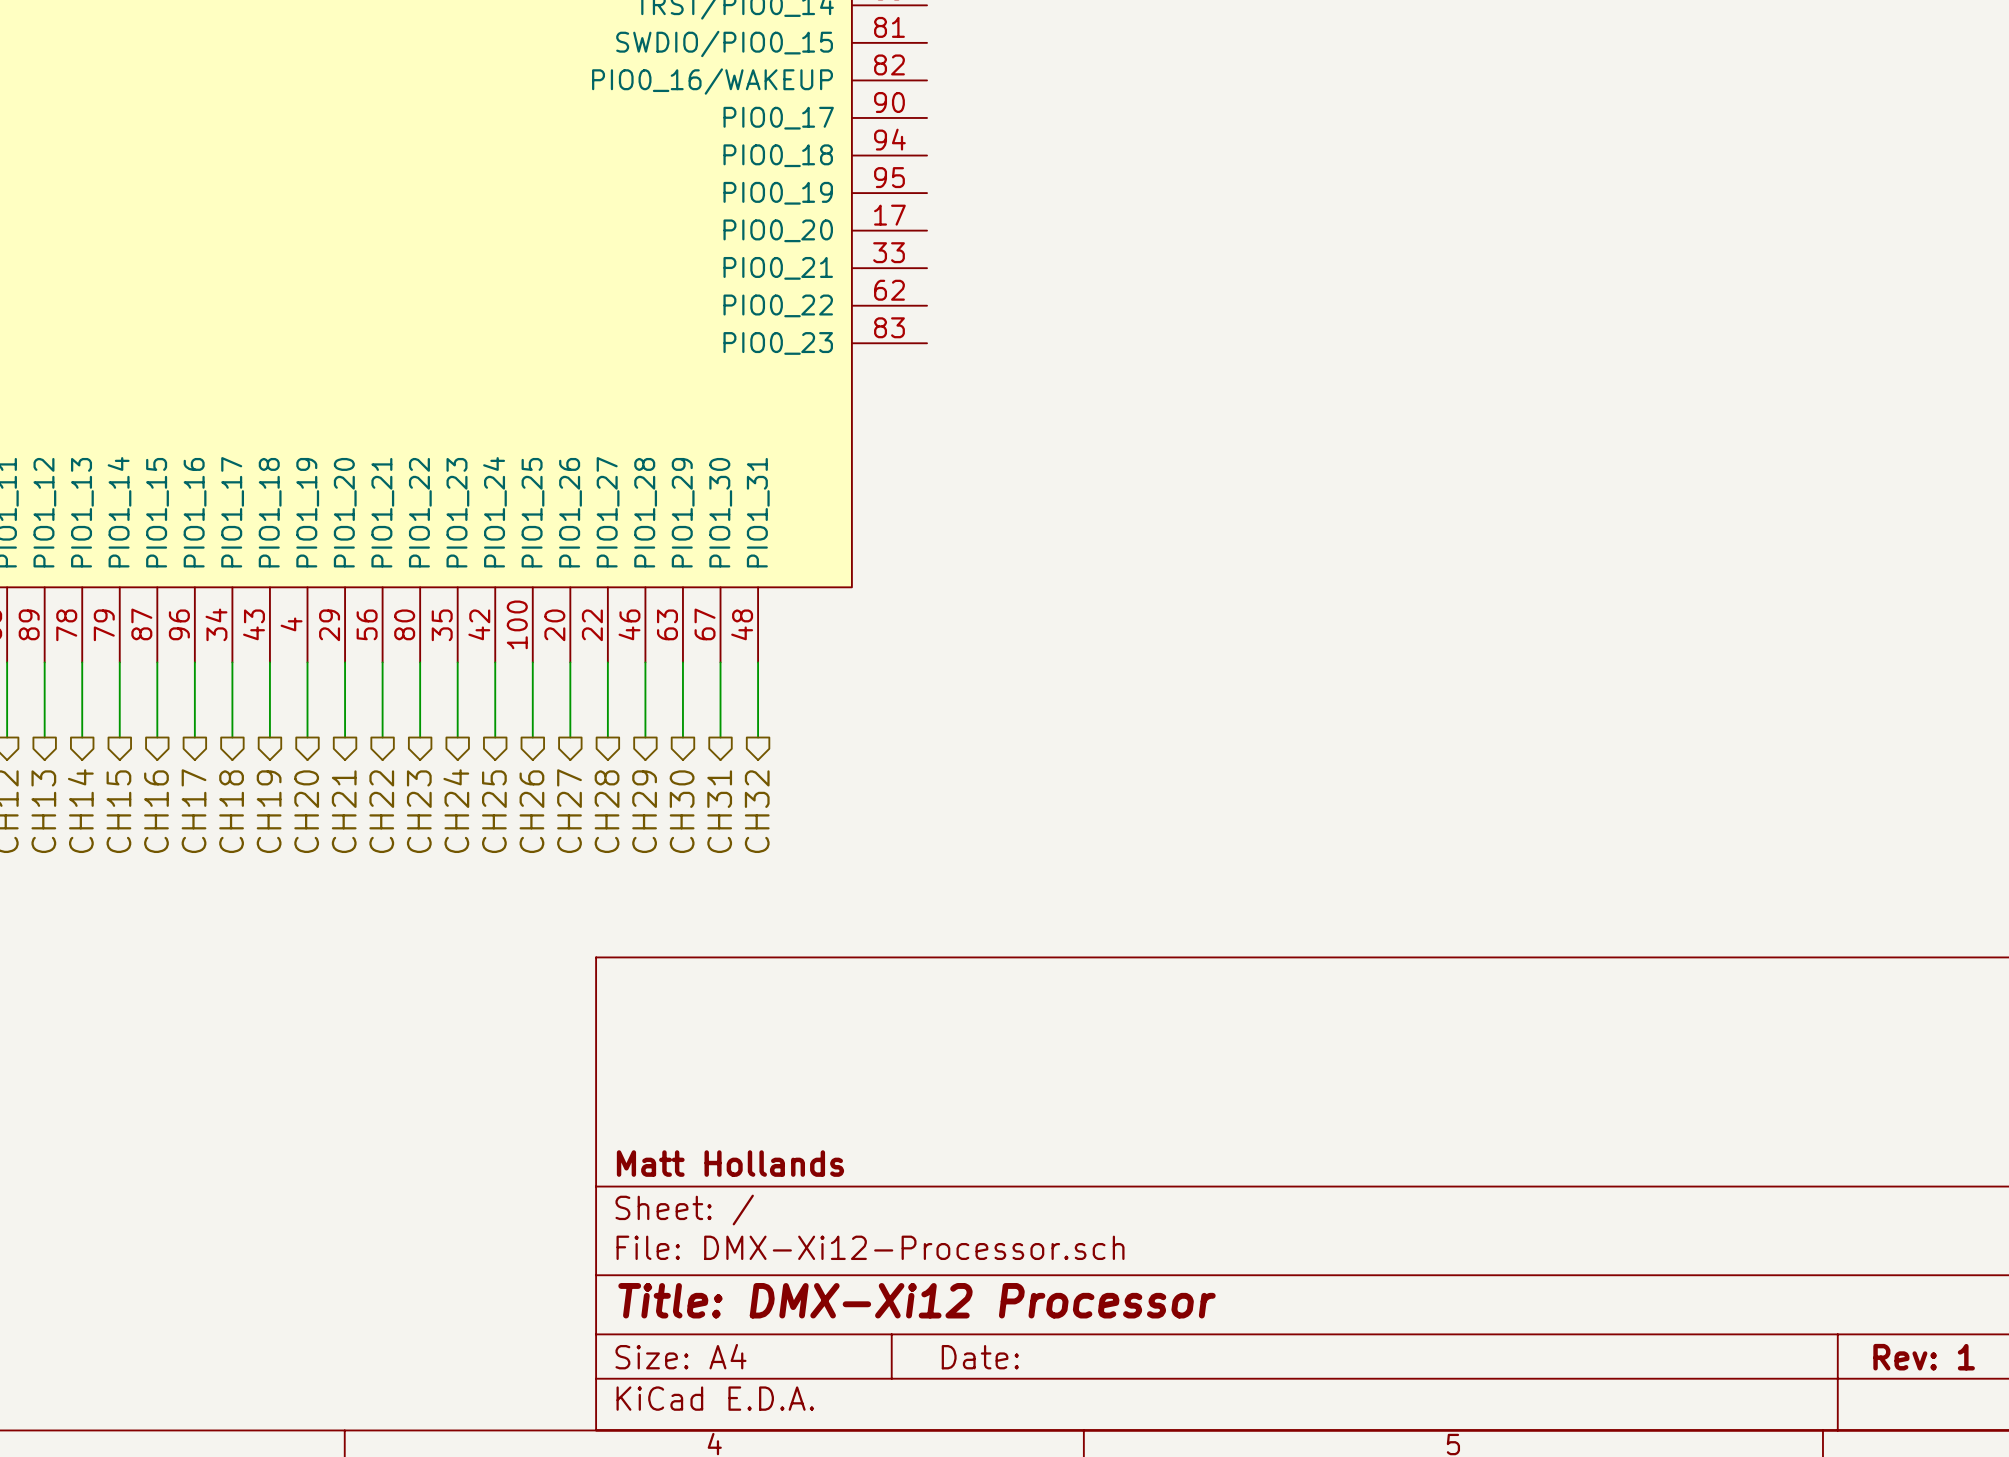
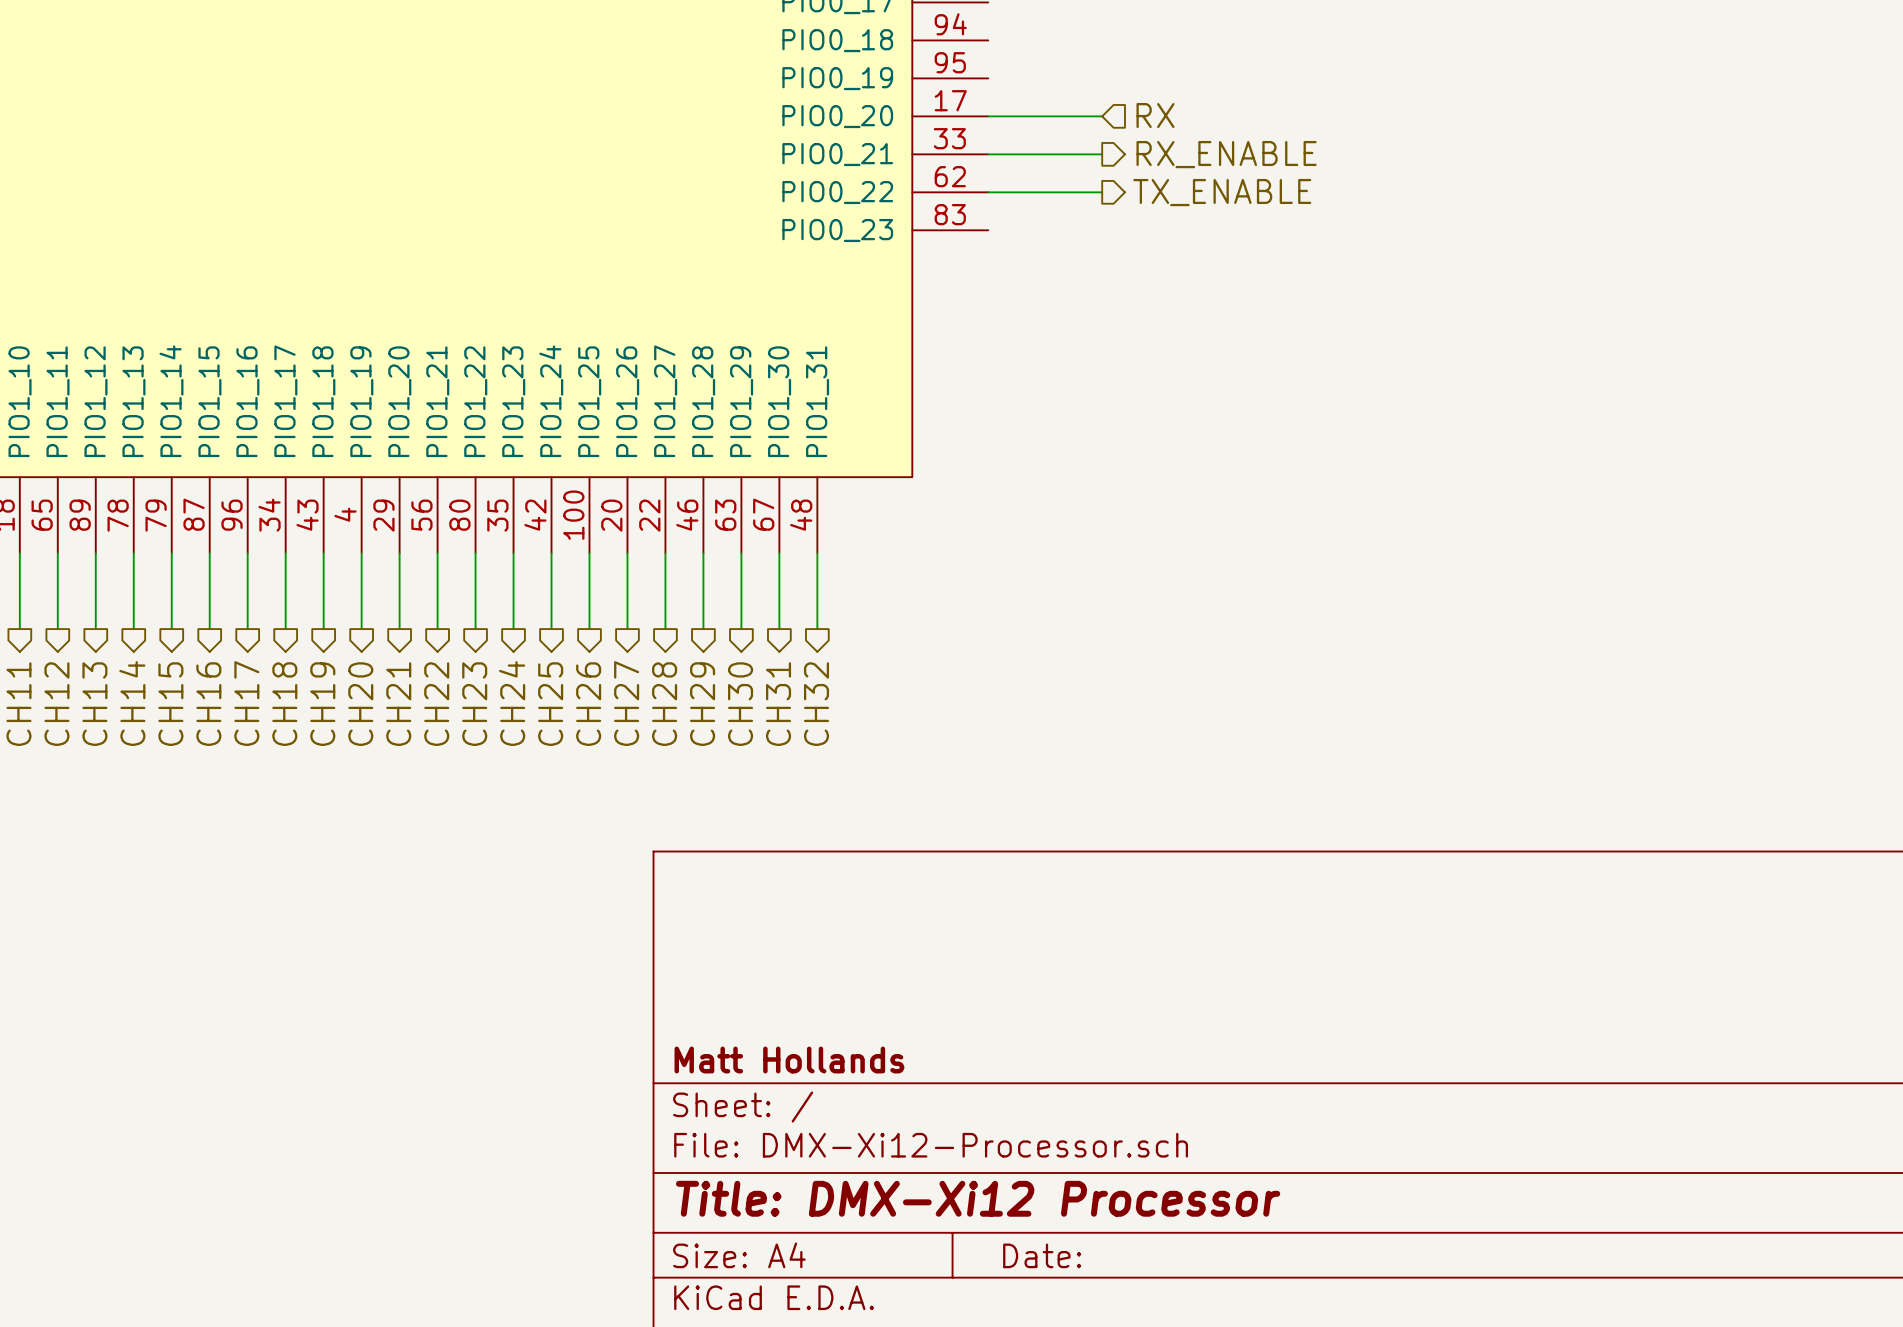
hierarchical label: none -> RX (1155, 115)
wire: none -> (988, 116) (1102, 116)
wire: none -> (988, 154) (1102, 154)
hierarchical label: none -> RX_ENABLE (1226, 154)
wire: none -> (988, 192) (1102, 192)
hierarchical label: none -> TX_ENABLE (1222, 192)

